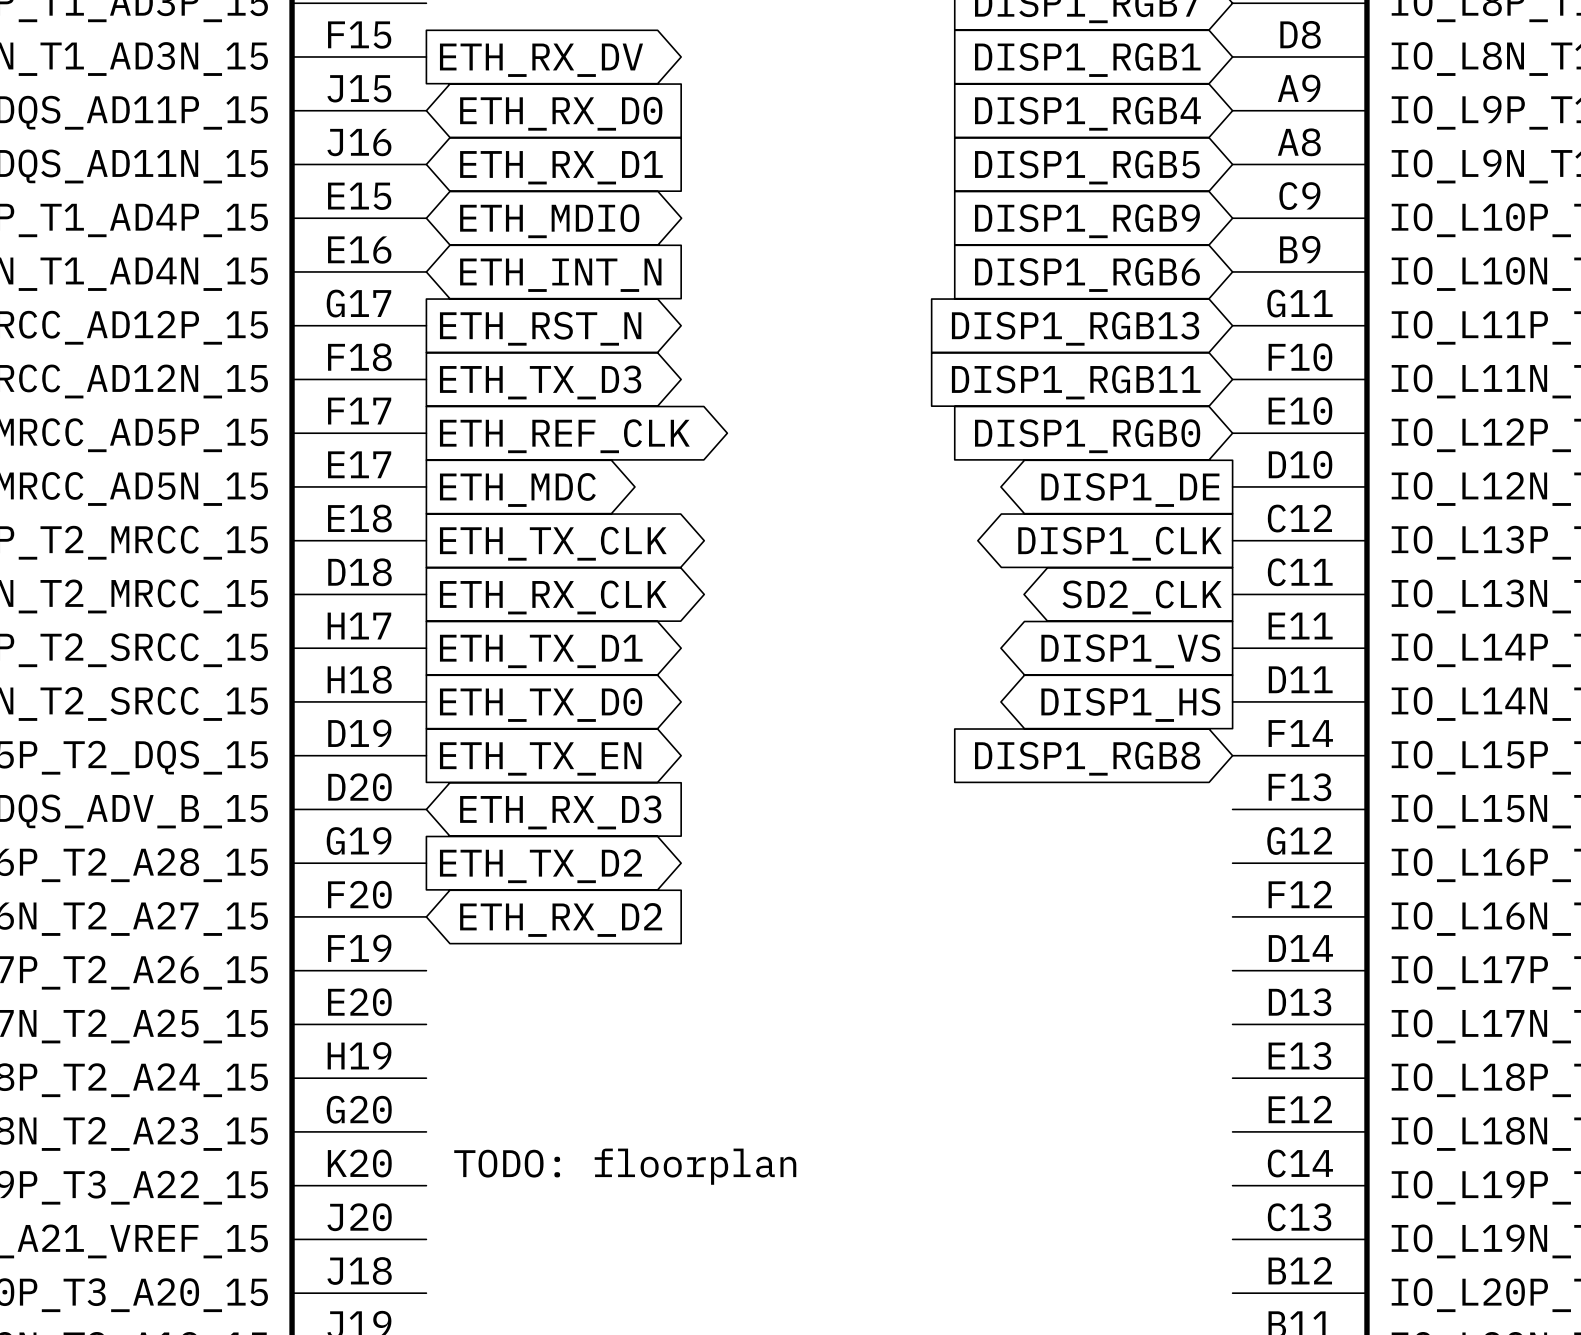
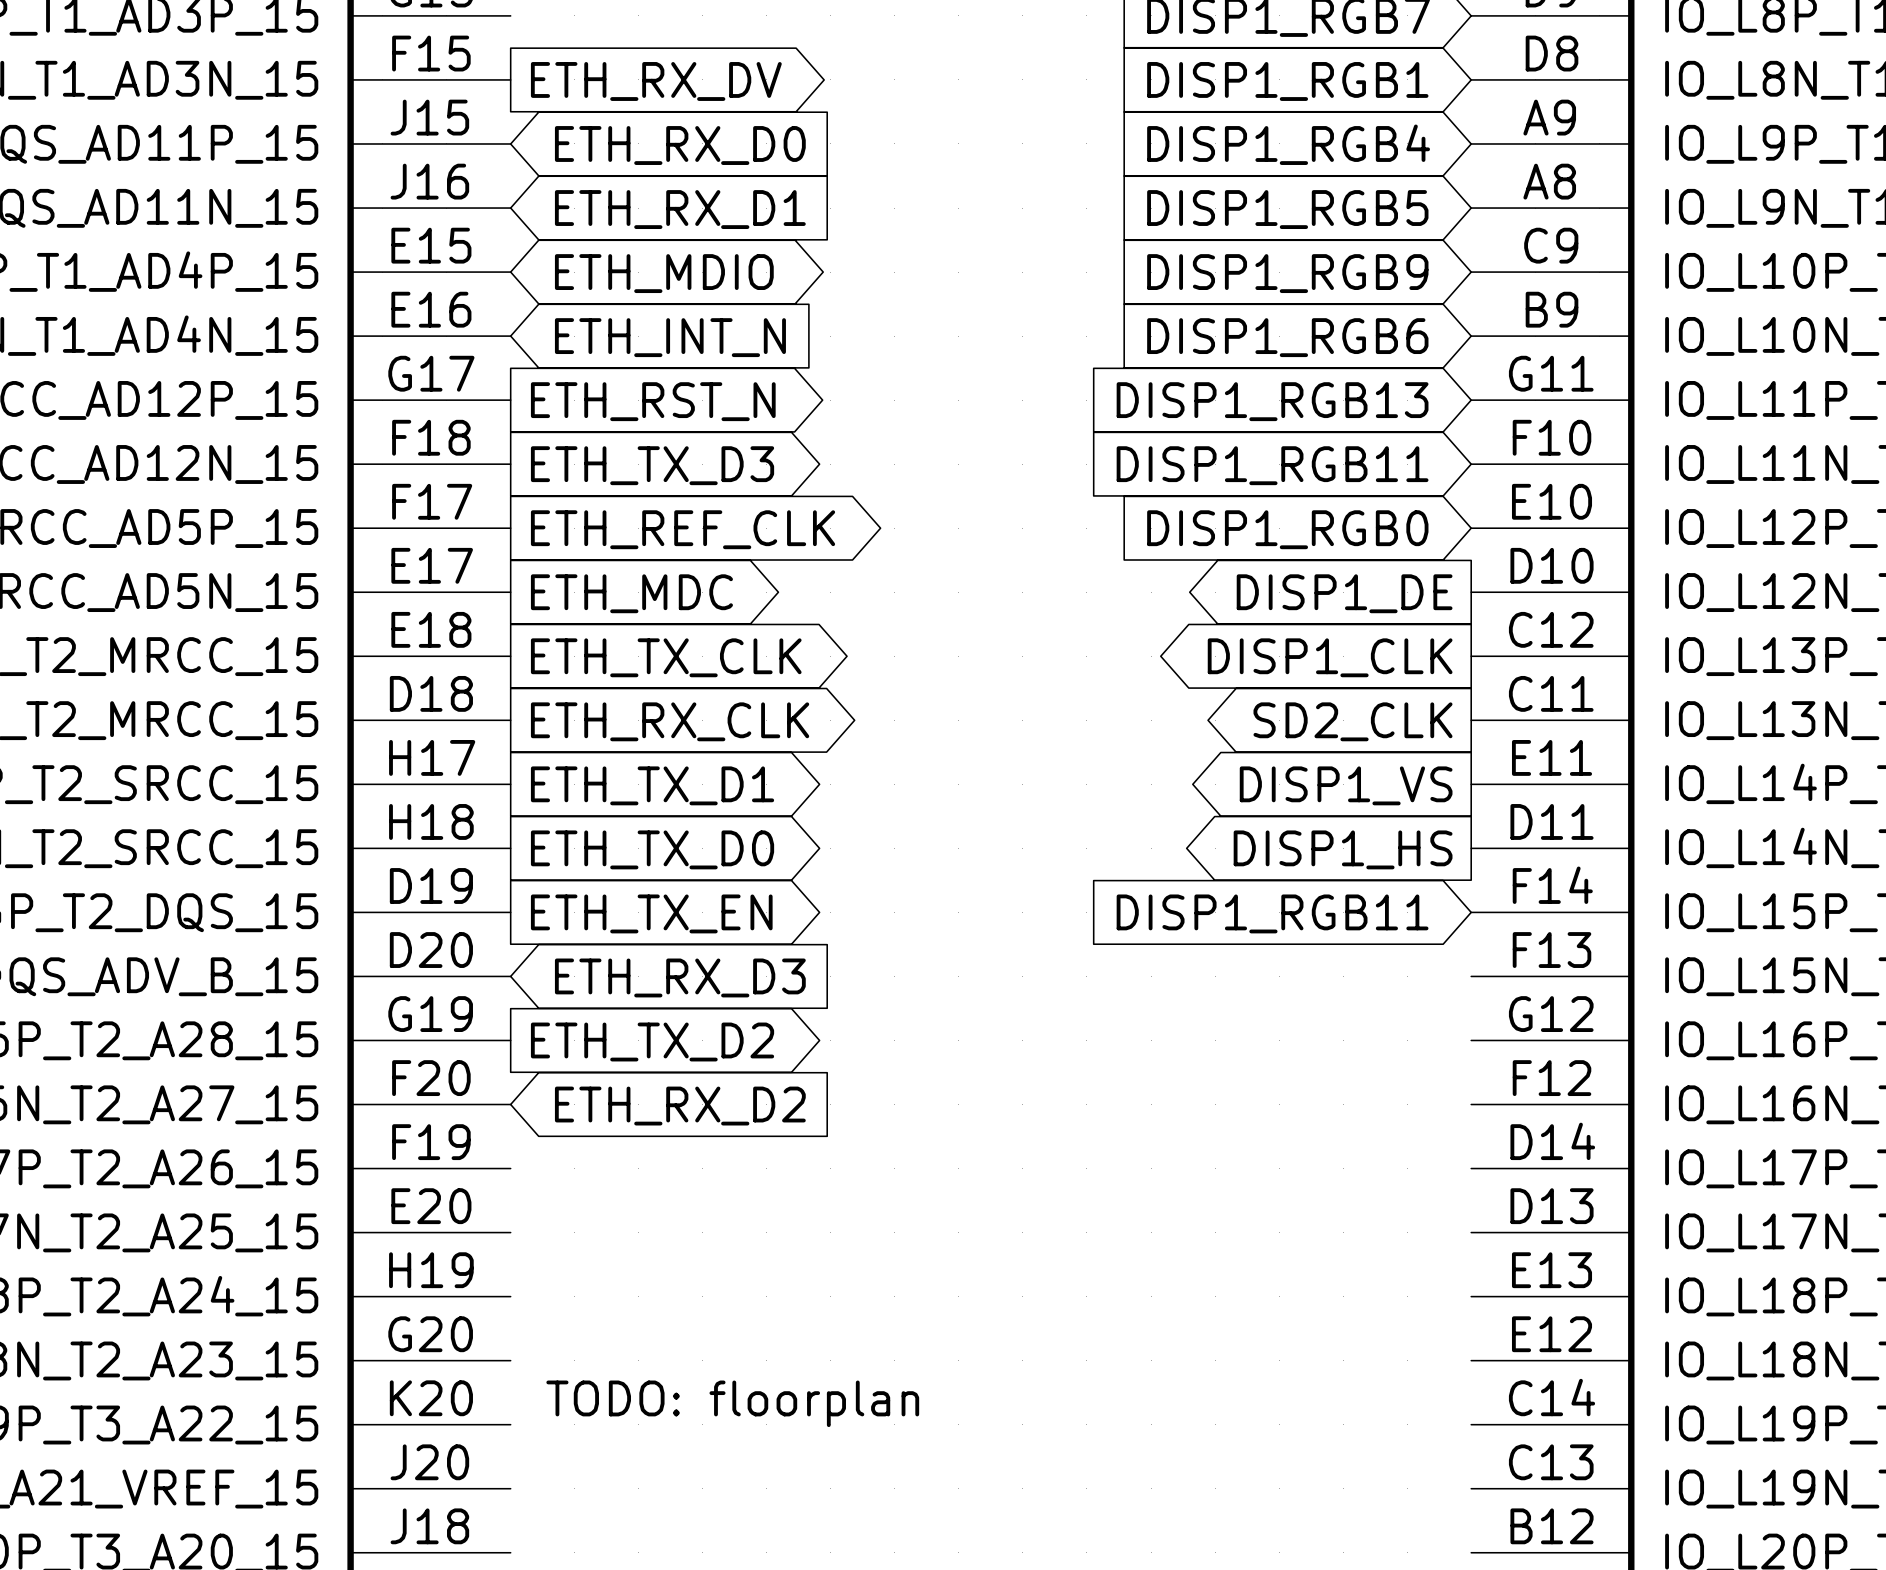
global label: DISP1_RGB8 (1087, 758) -> DISP1_RGB11 (1272, 913)

